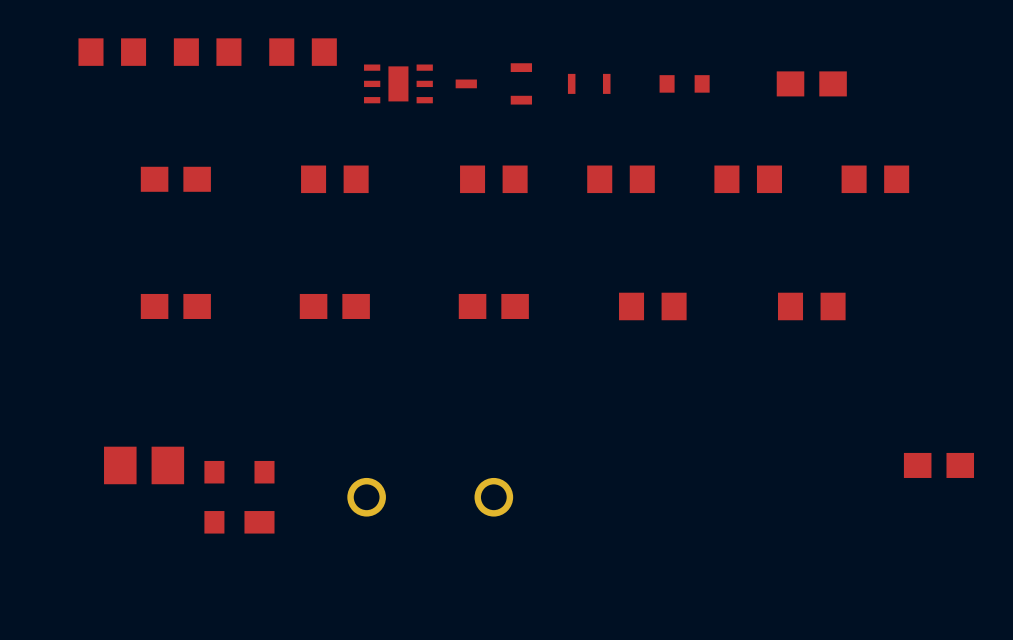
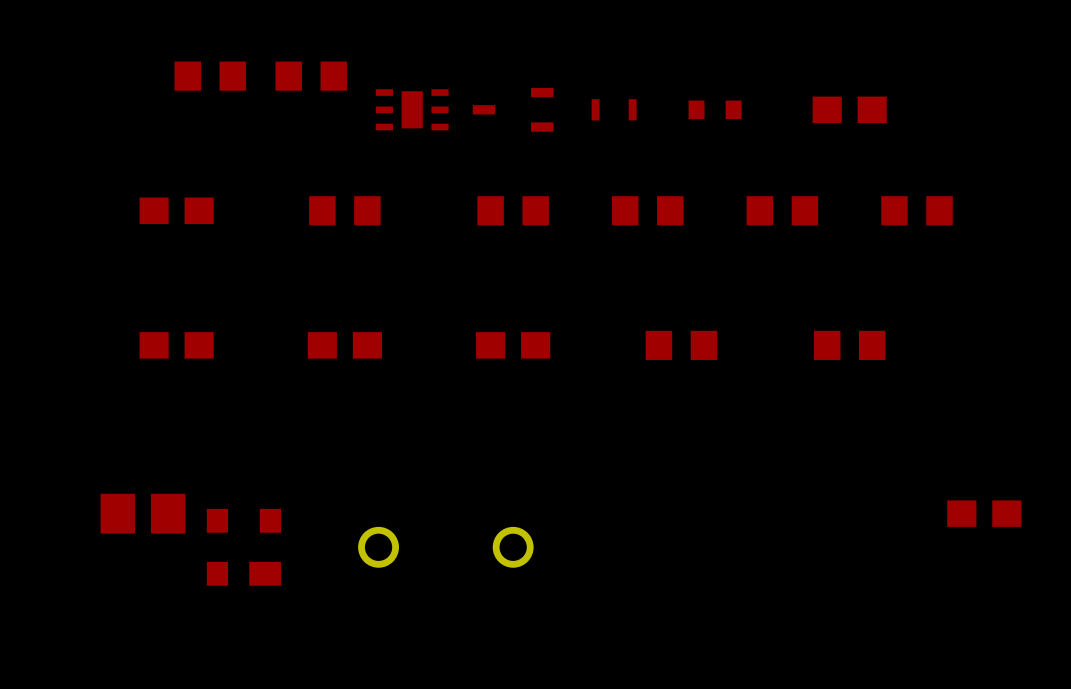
part: (112, 52) -> none

